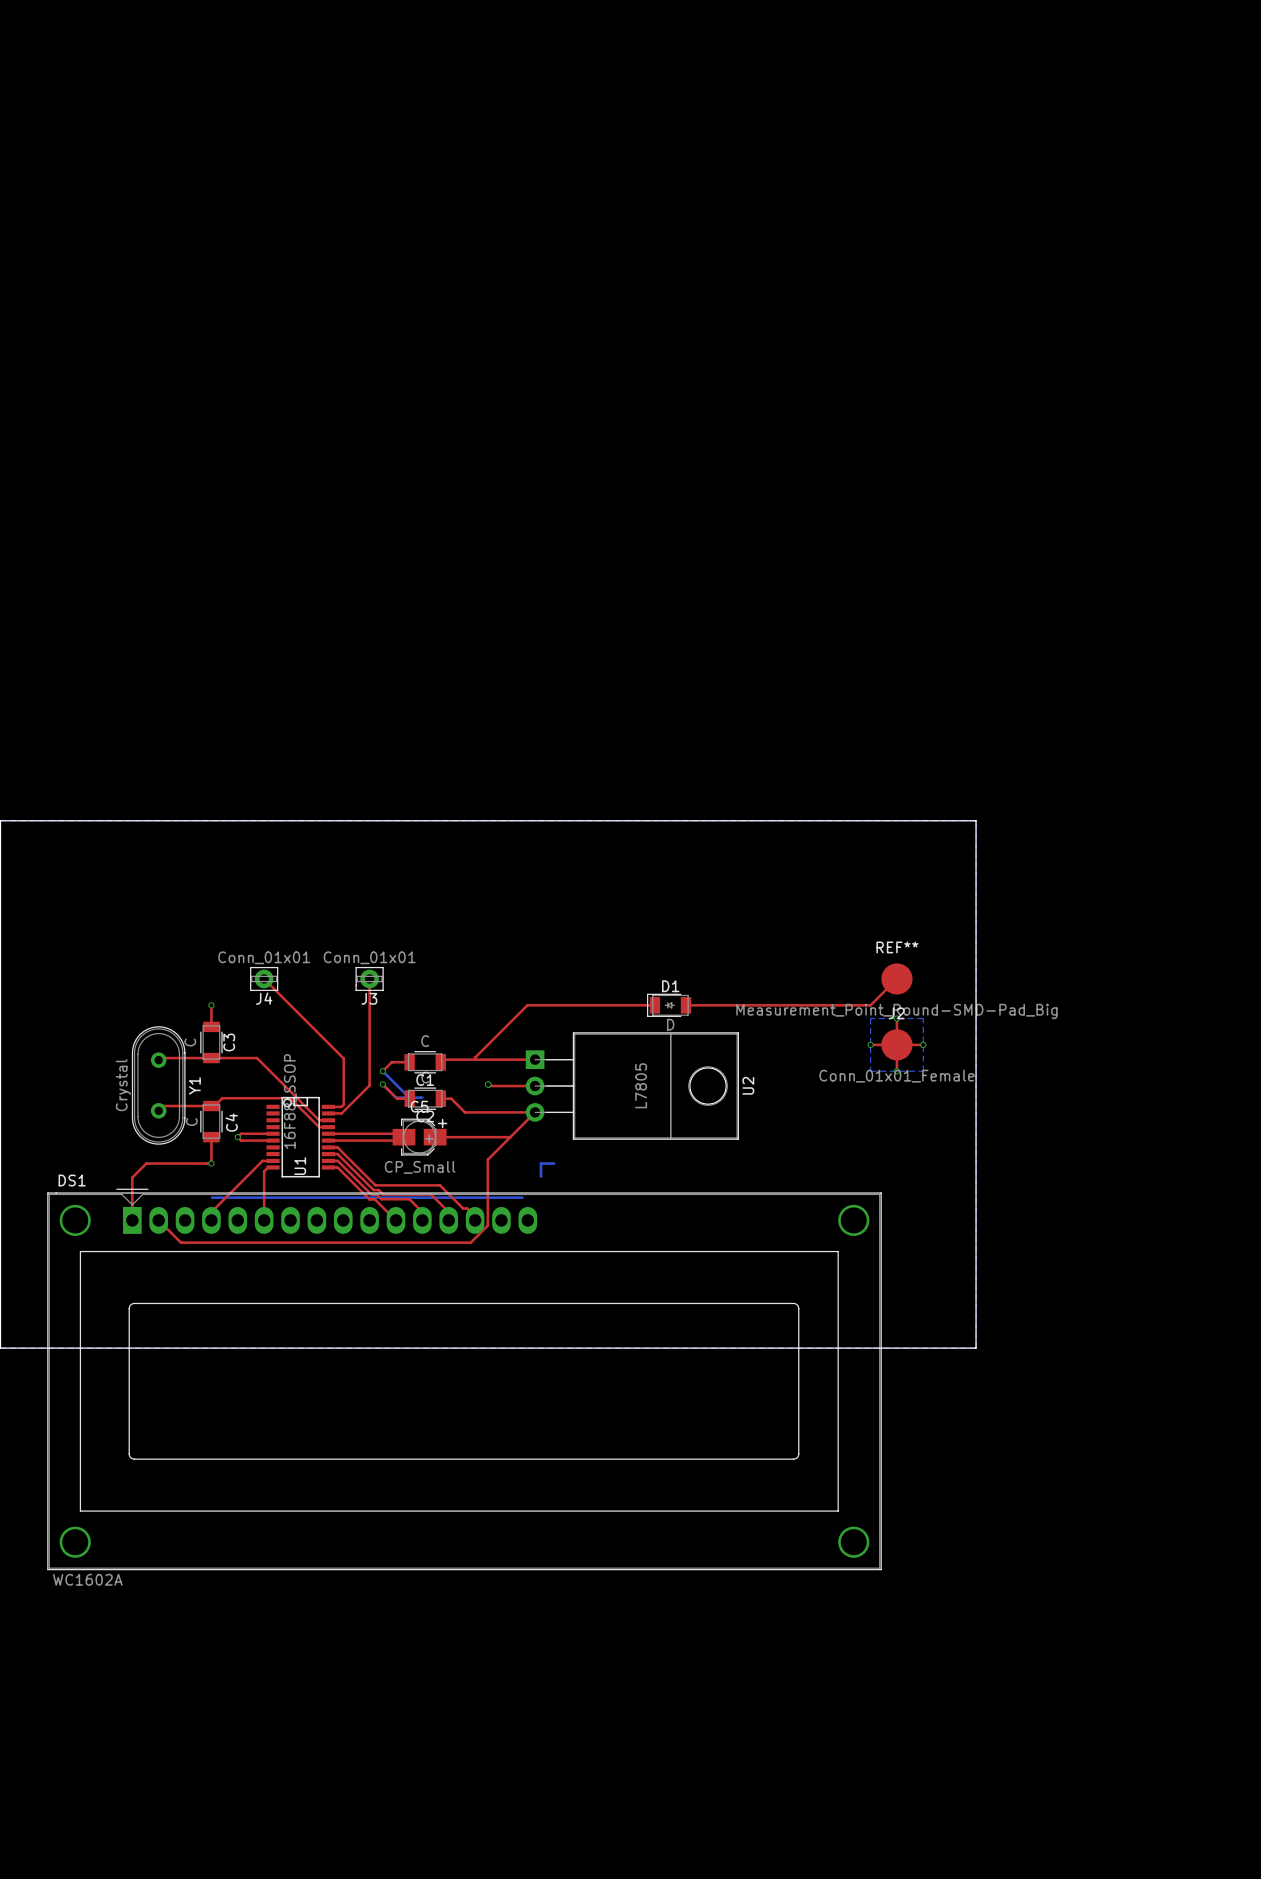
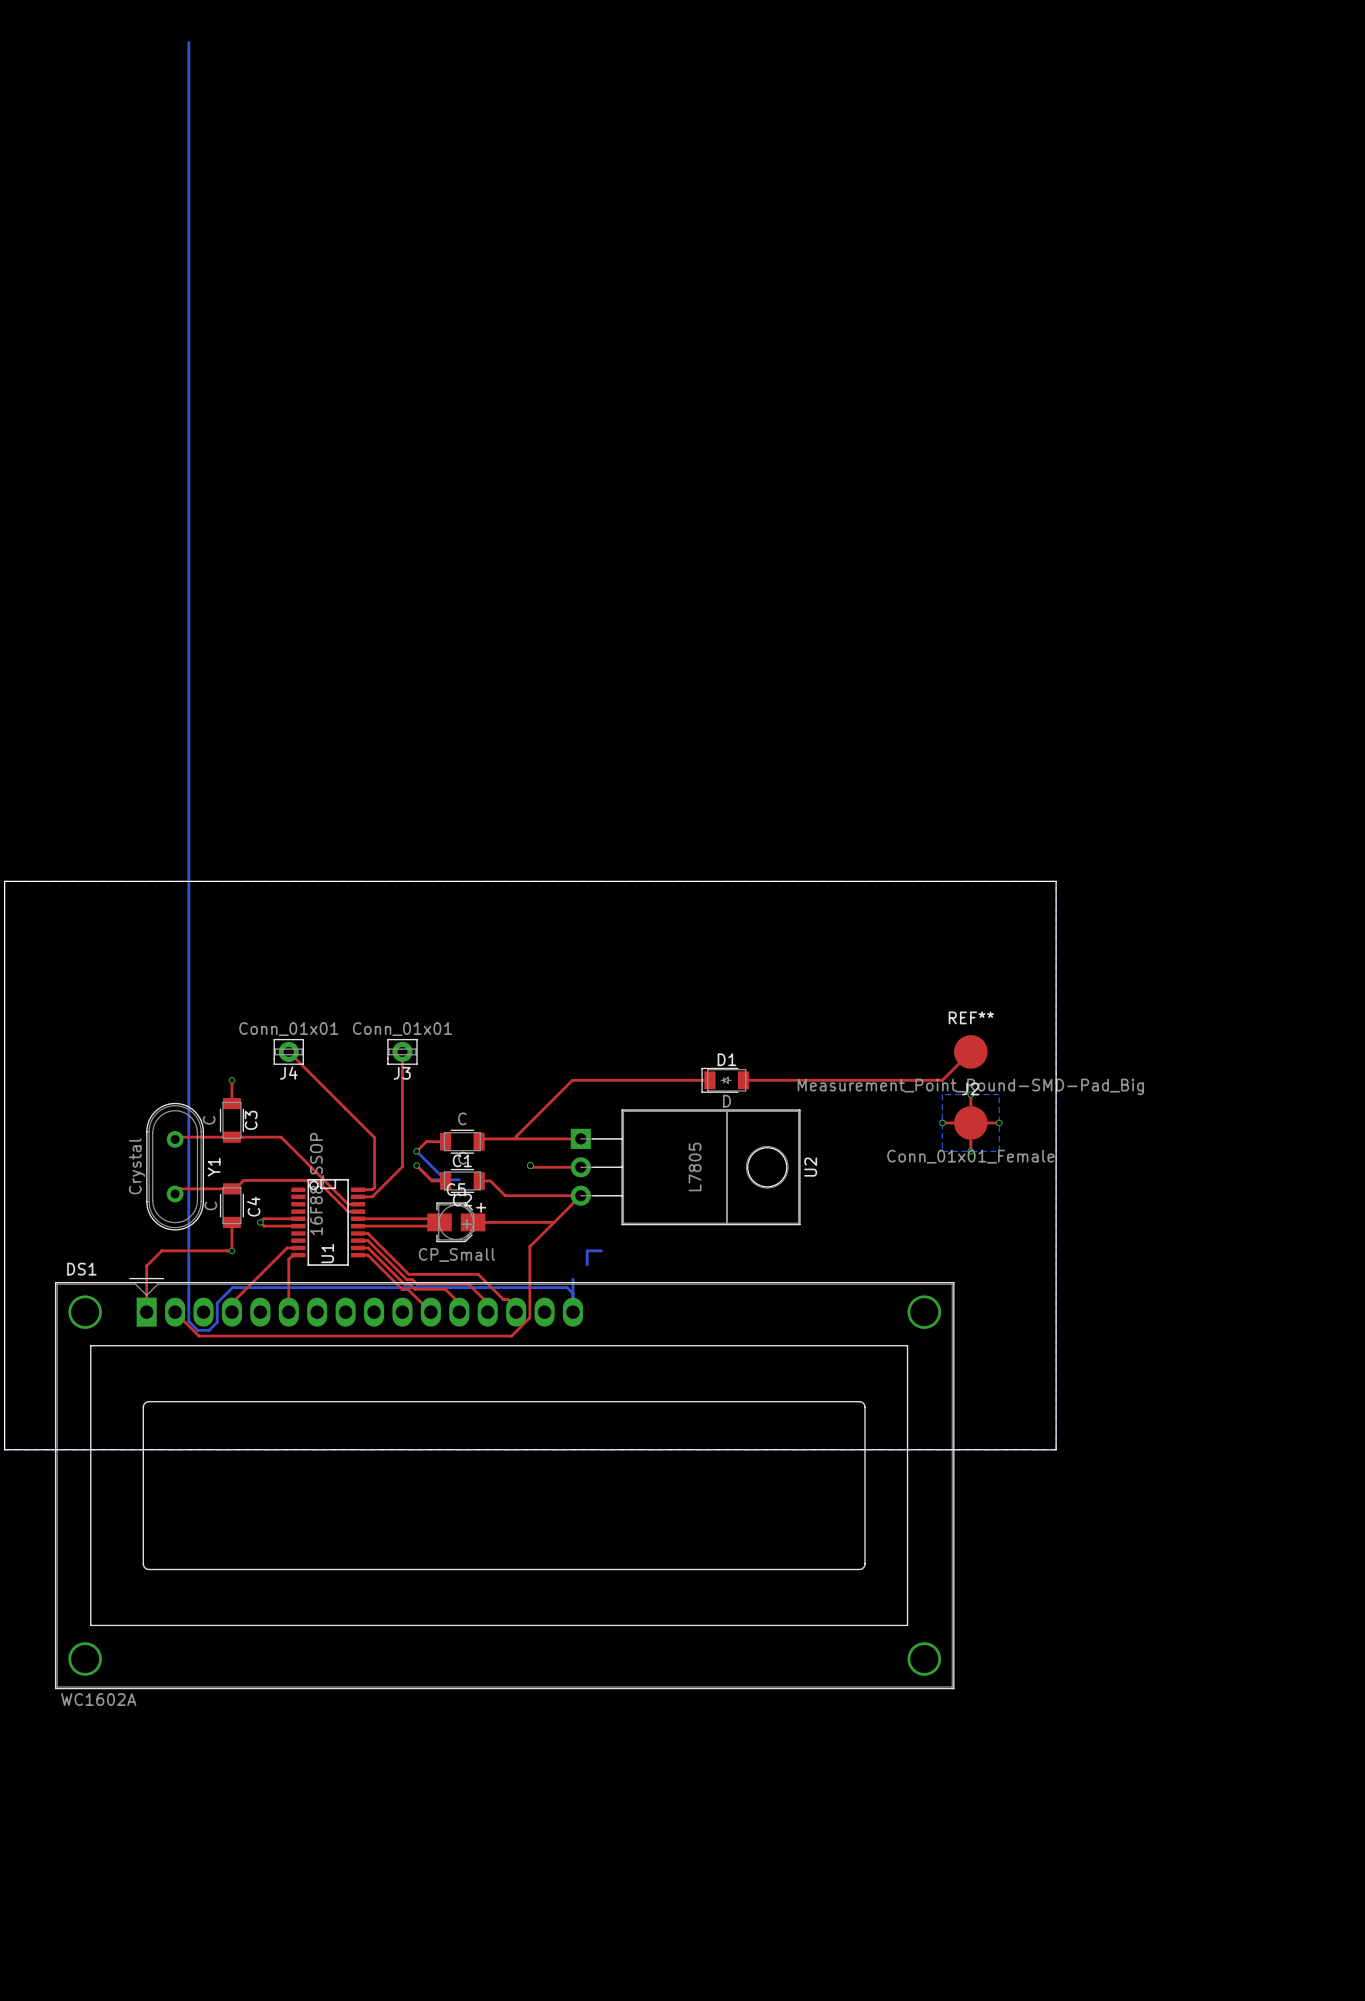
bottom track: none -> (188, 42) (188, 1321) (197, 1330) (209, 1330) (217, 1322) (217, 1303) (232, 1287)
bottom track: none -> (572, 1279) (572, 1312)
bottom track: none -> (567, 1287) (572, 1293)

